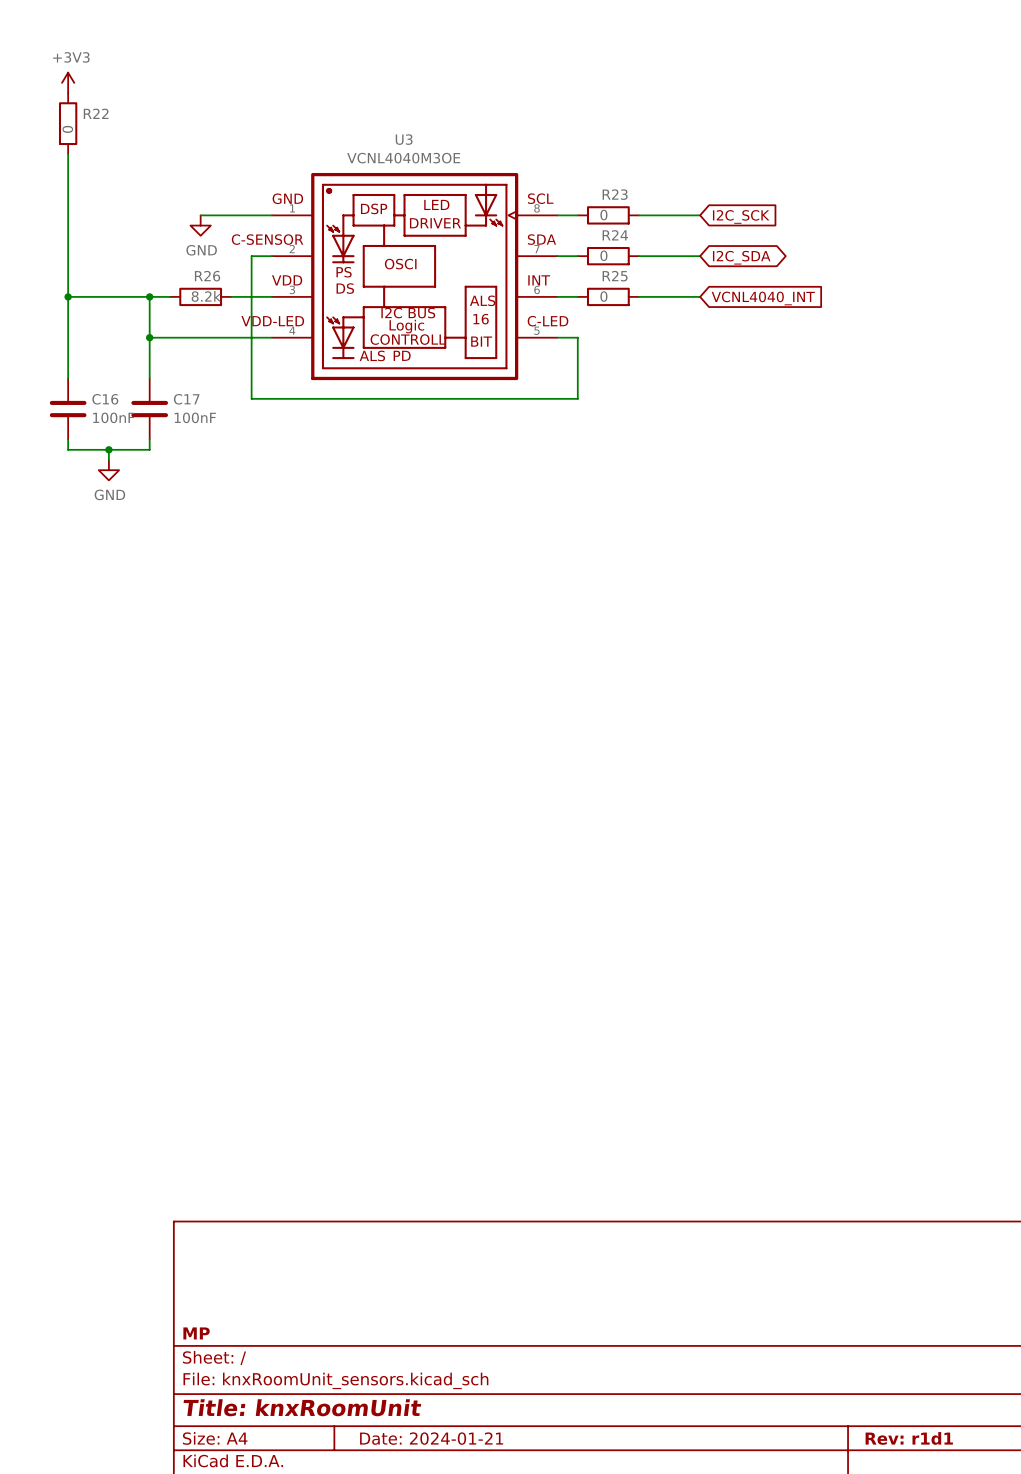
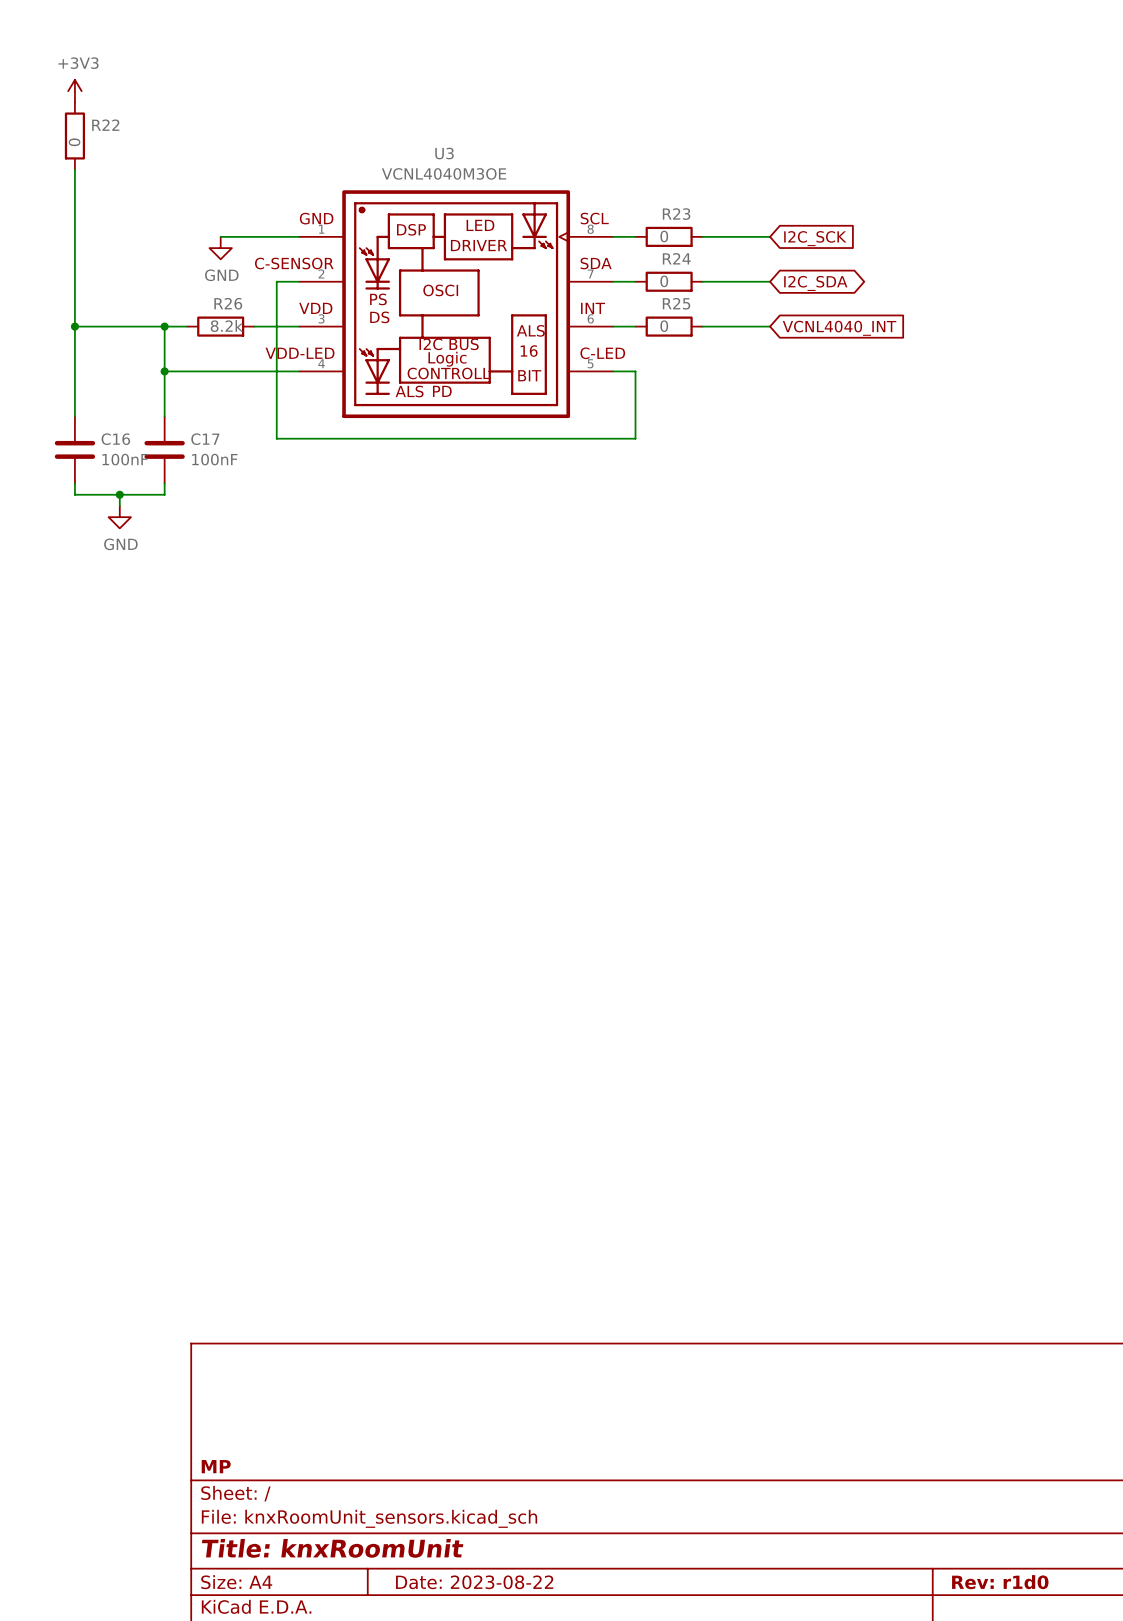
title block: Date: 2024-01-21 (431, 1438) -> Date: 2023-08-22 (474, 1582)
title block: Rev: r1d1 (909, 1438) -> Rev: r1d0 (1000, 1582)

